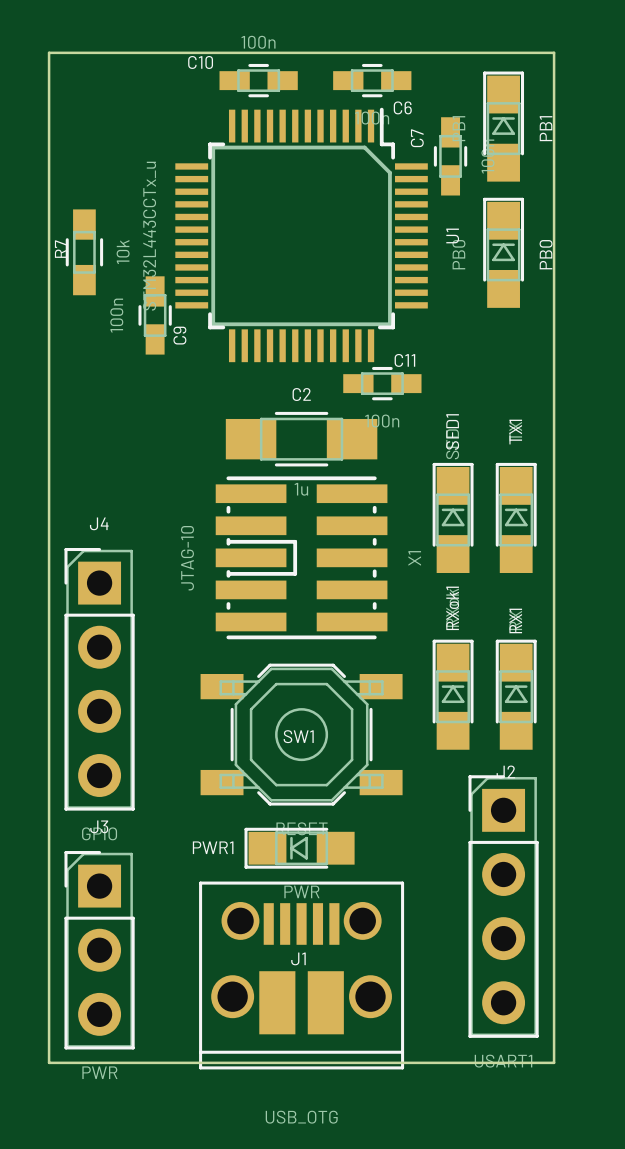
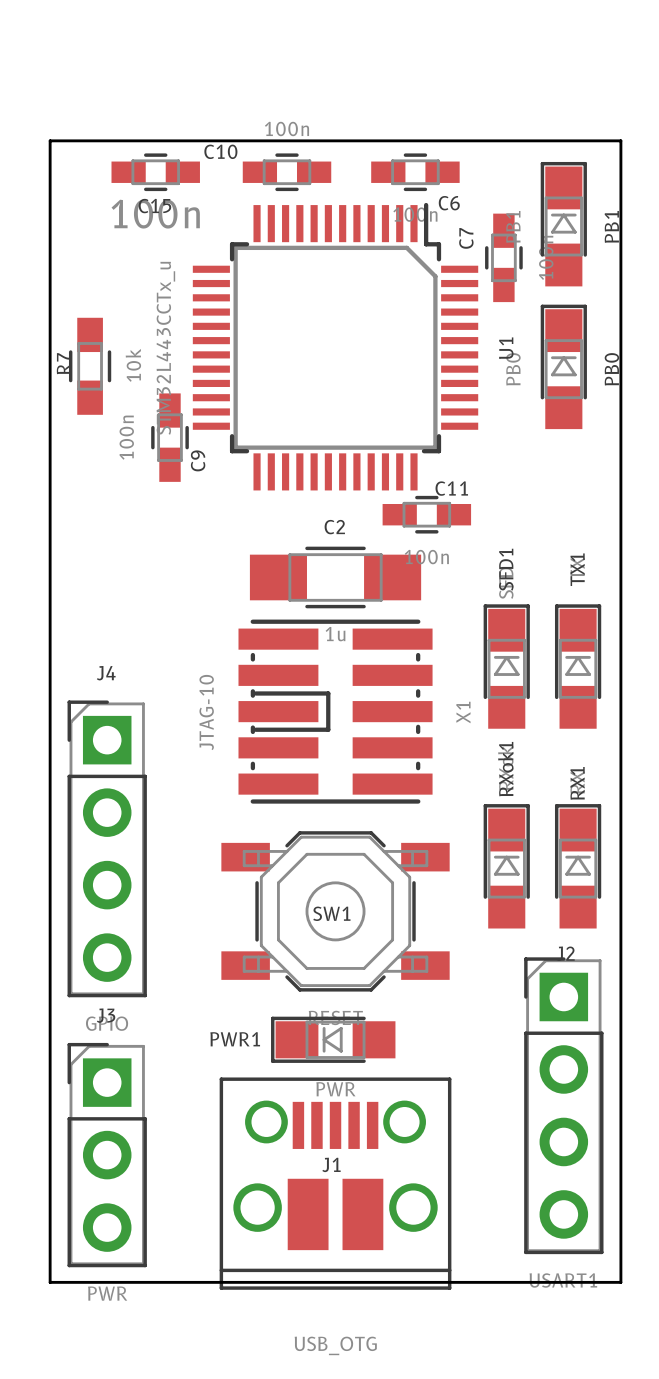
C15: none -> 100n (155, 172)

